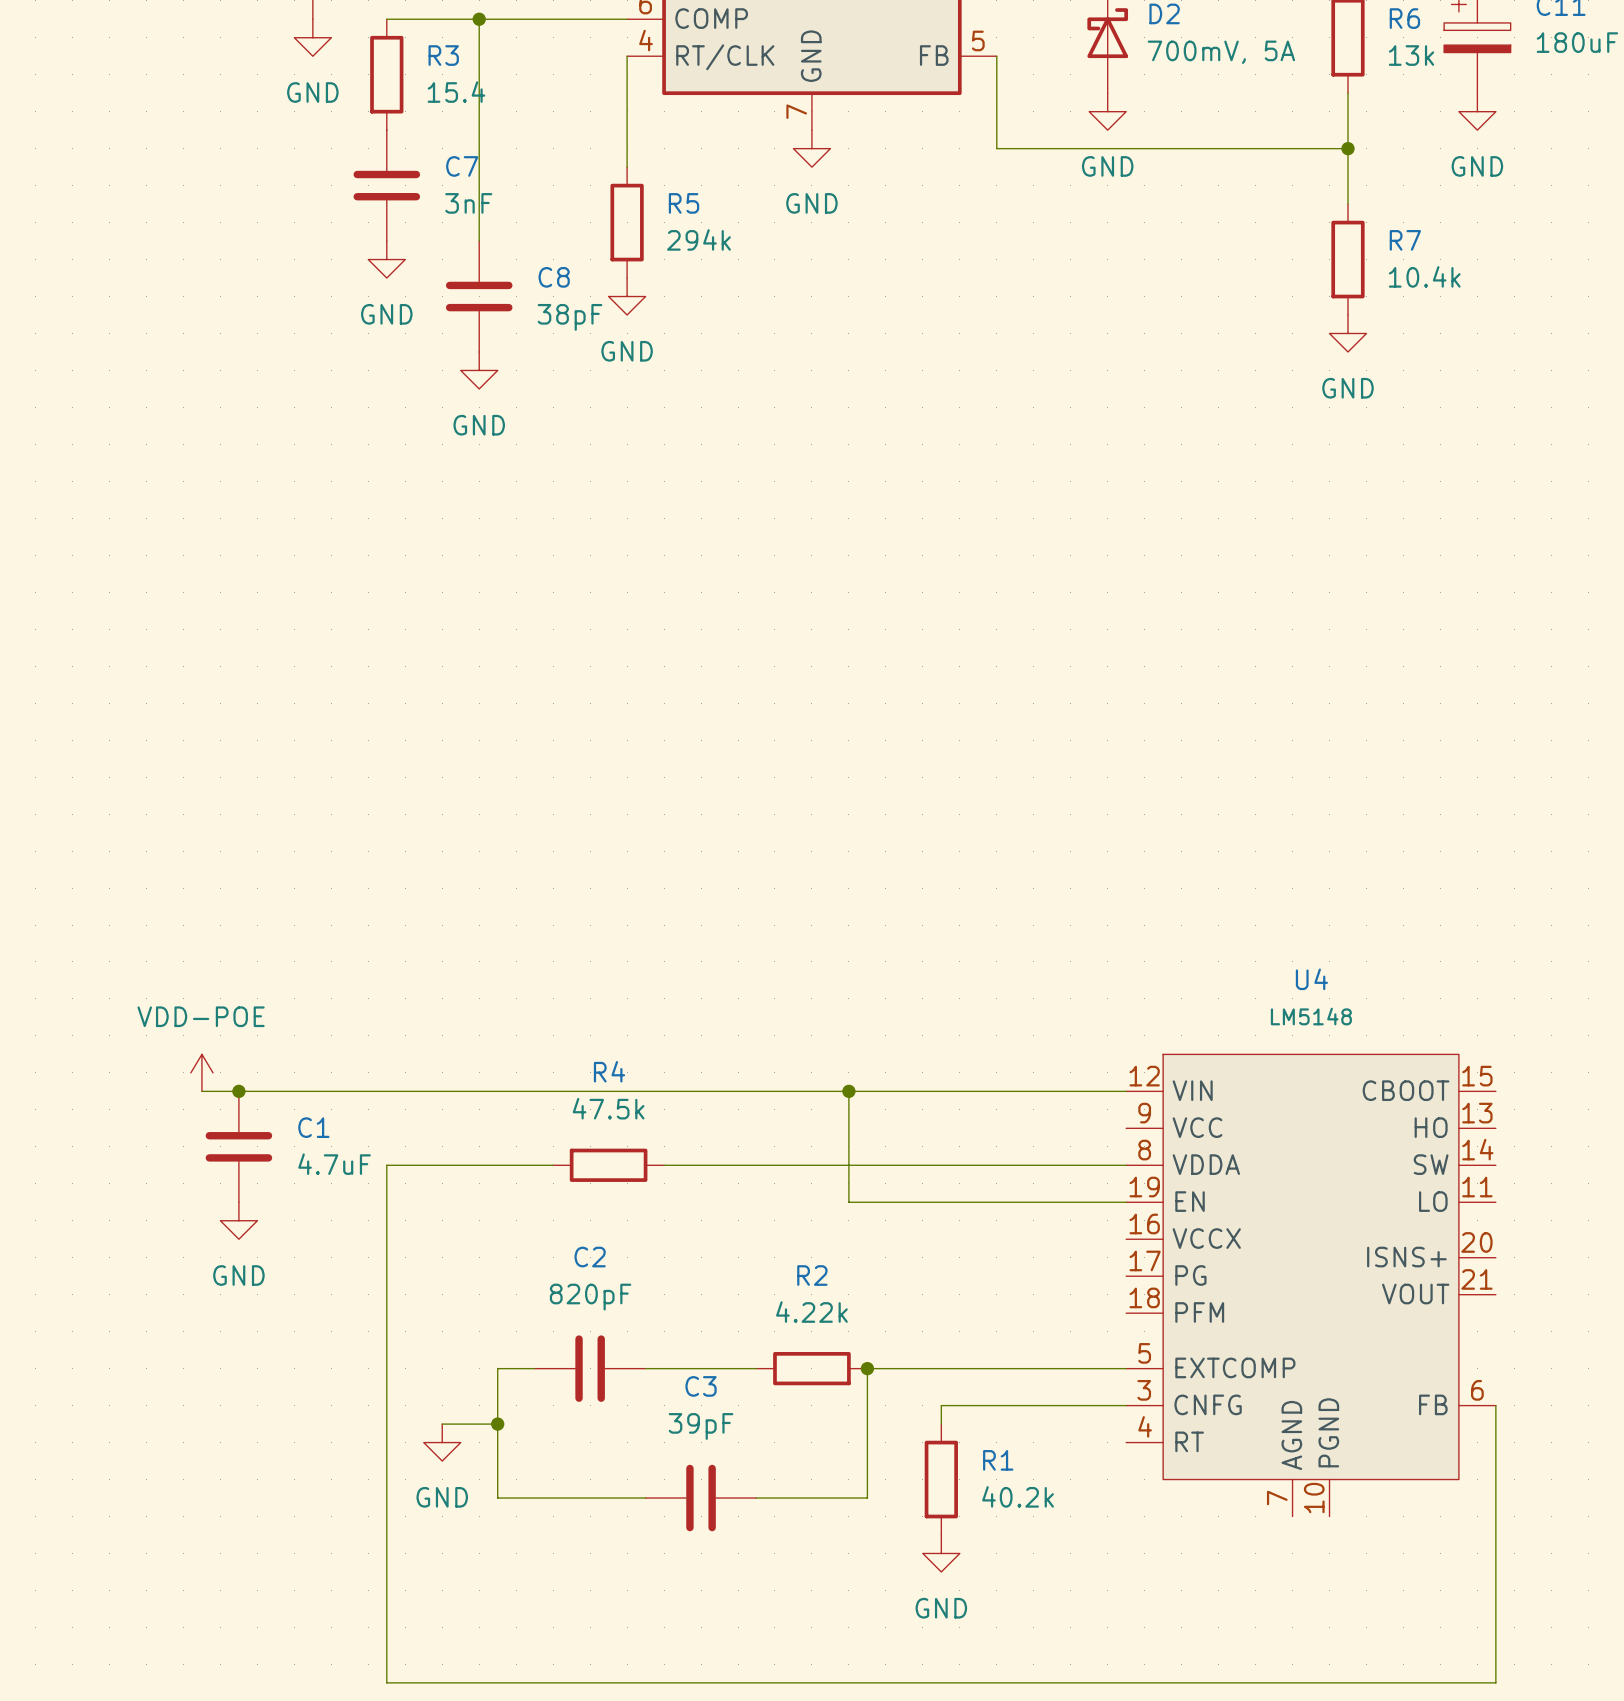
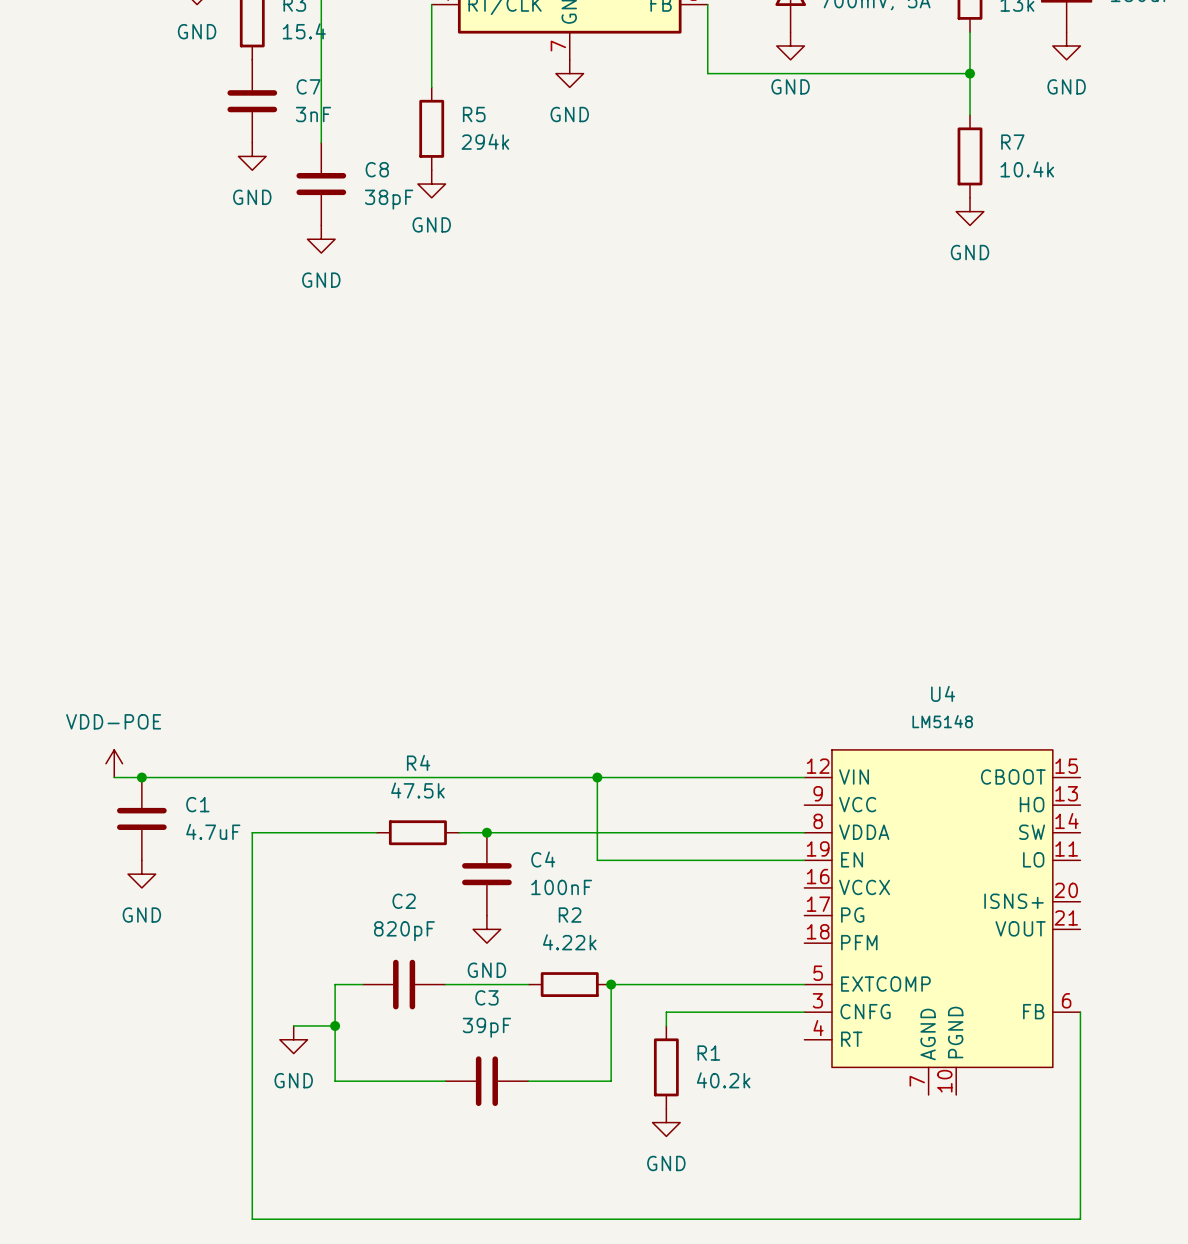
junction: none -> (486, 832)
C4: none -> 100nF (486, 874)
power symbol: none -> GND (486, 929)

